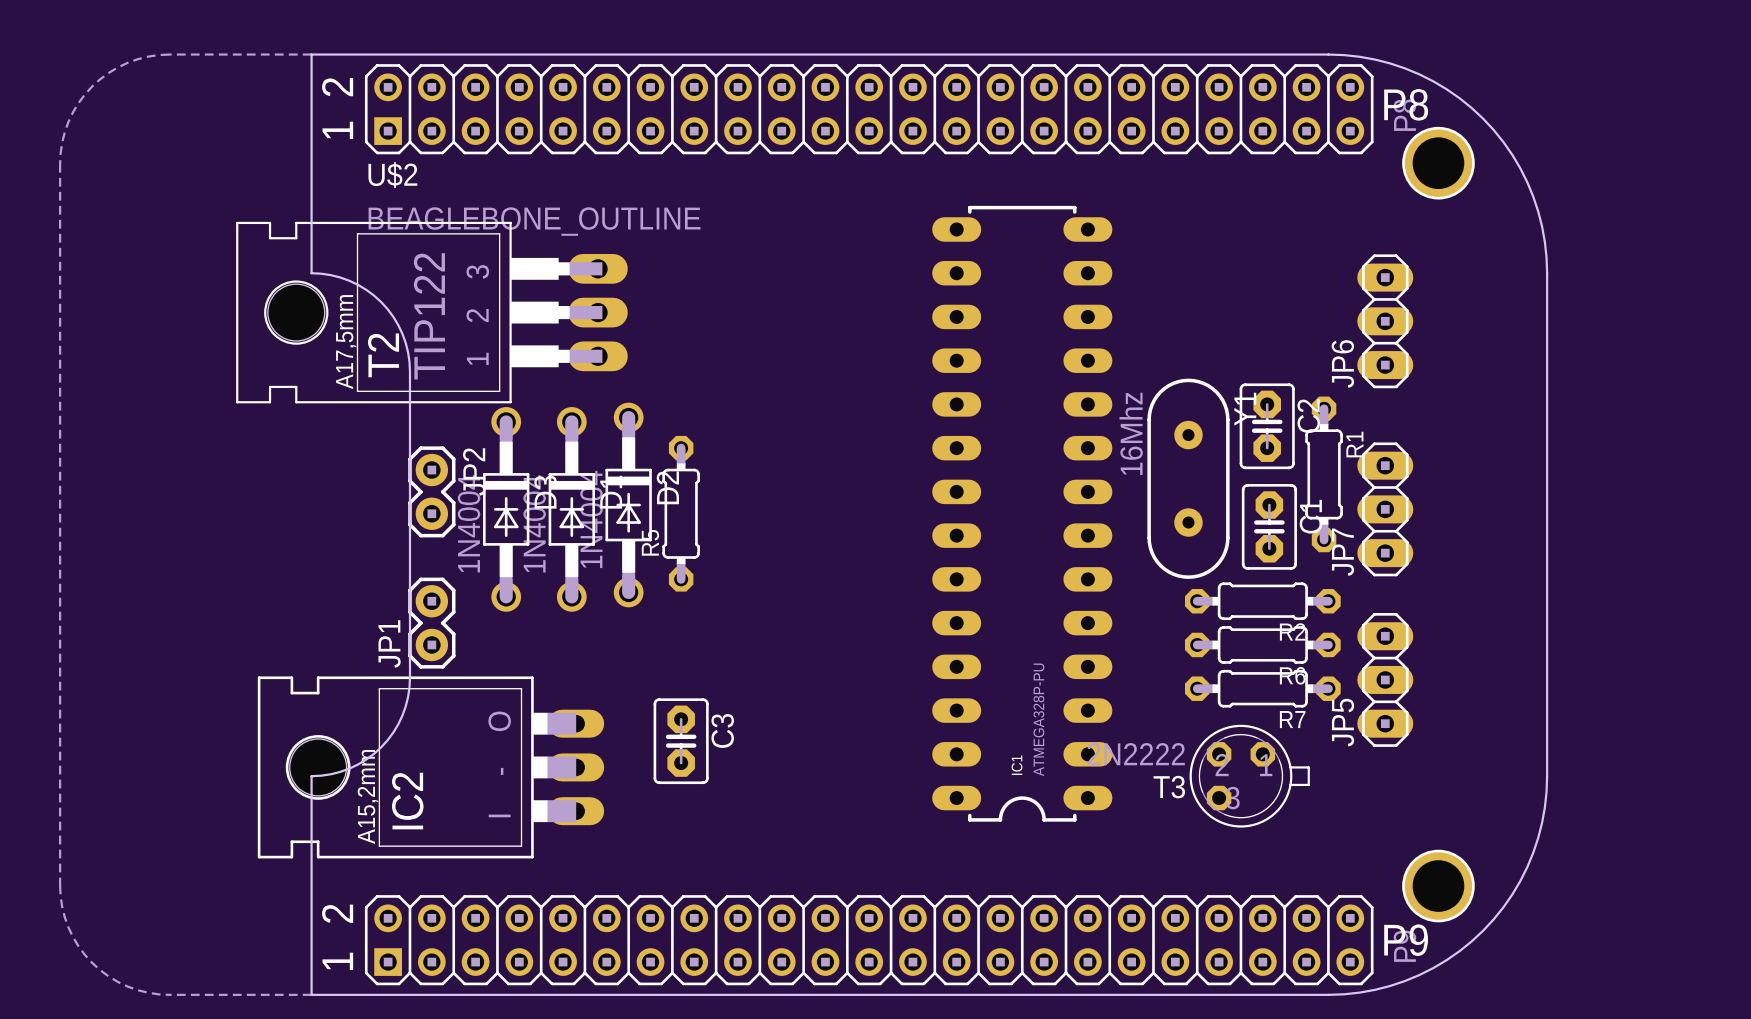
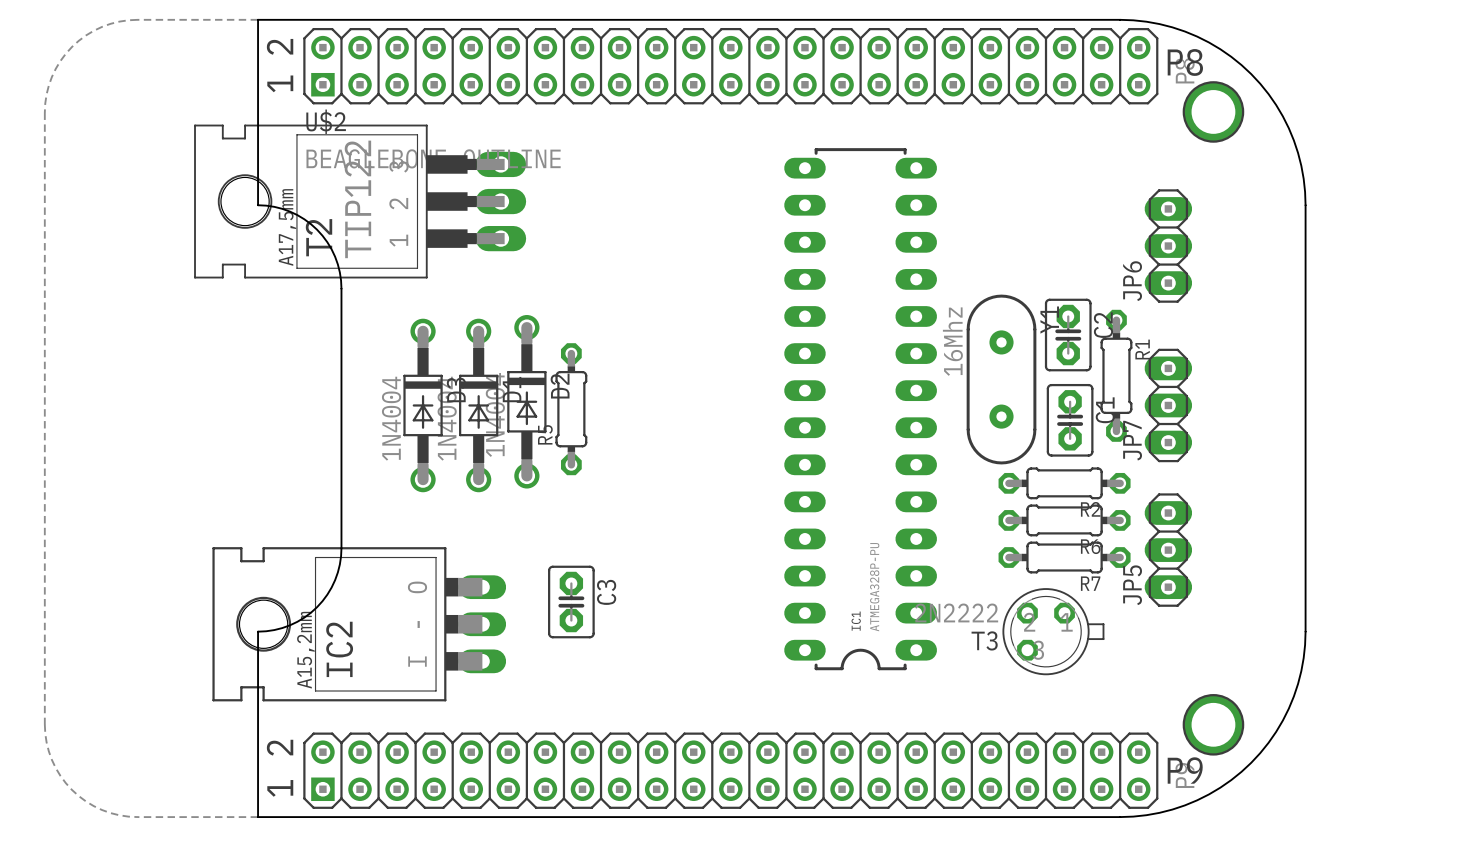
T2 position: (431, 312) -> (360, 201)
JP2: (431, 491) -> none
JP1: (431, 623) -> none

